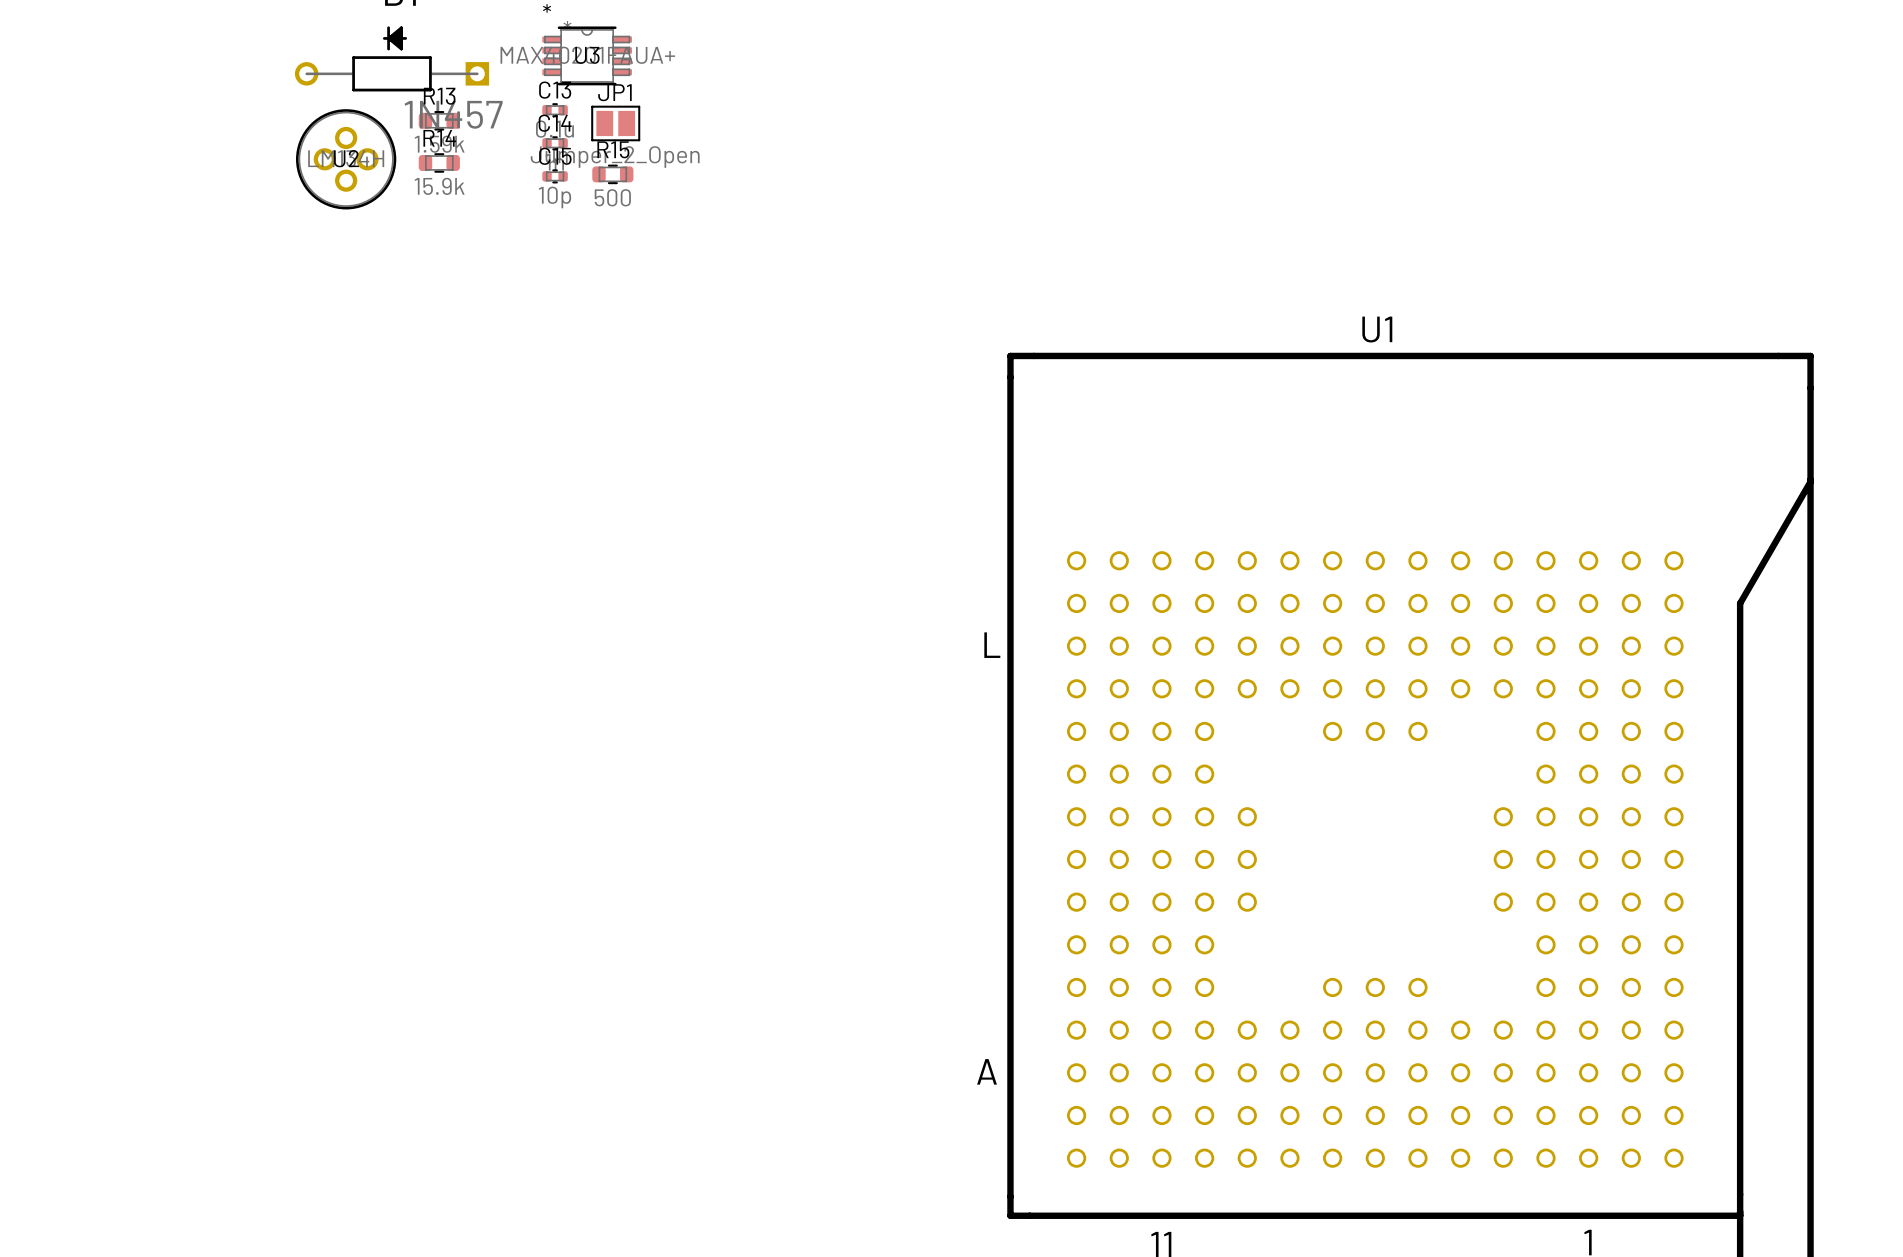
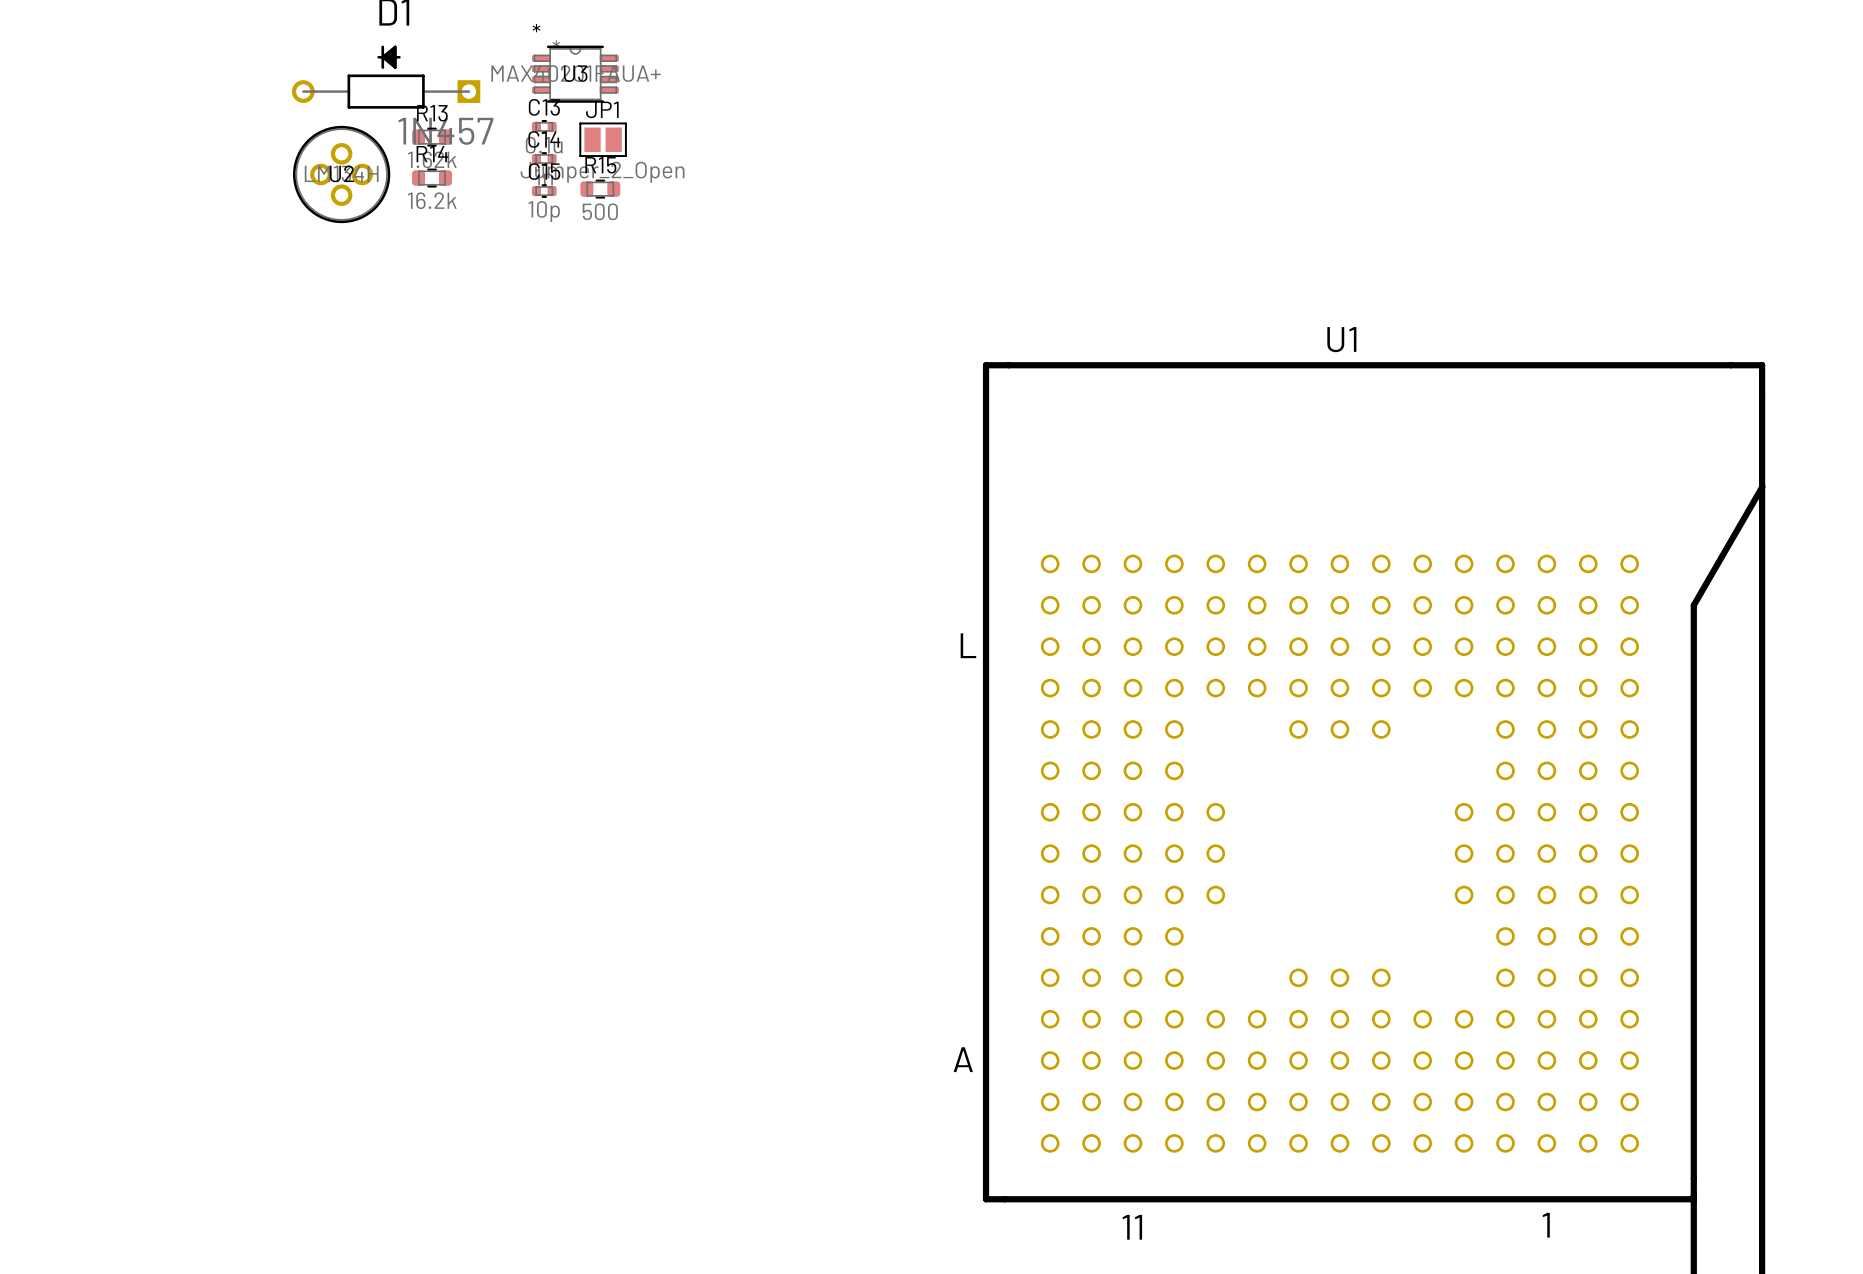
R13 value: 1.59k (439, 144) -> 1.62k (432, 159)
R14 value: 15.9k (439, 186) -> 16.2k (432, 200)

